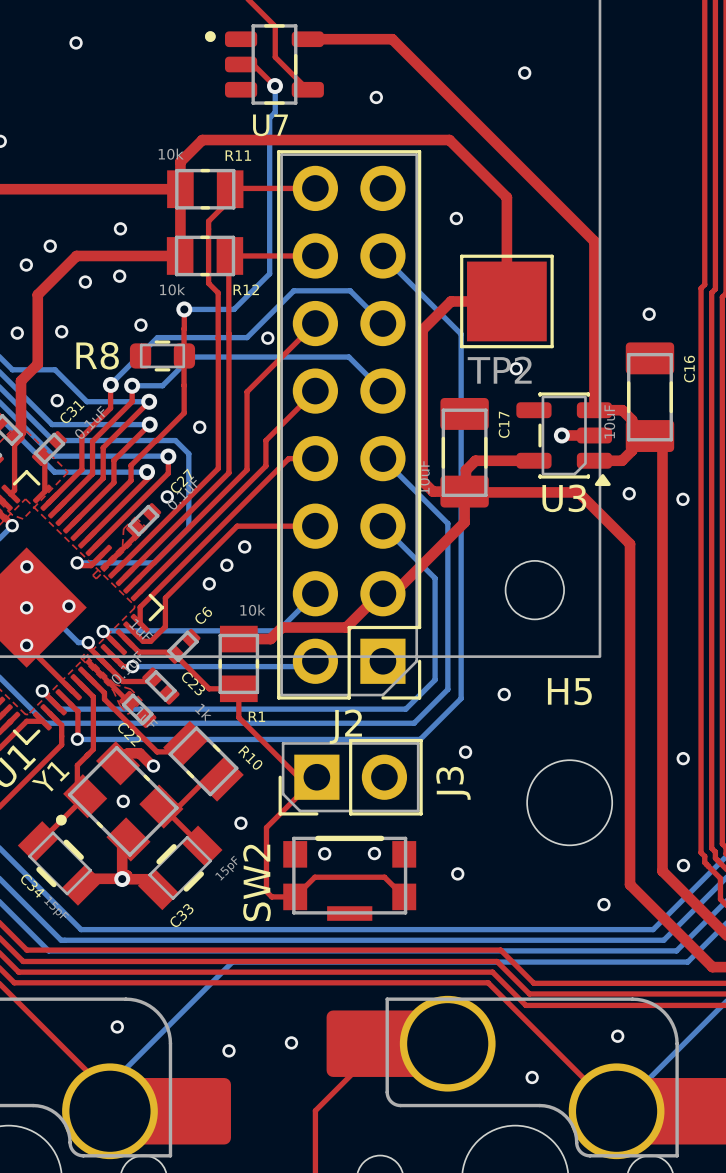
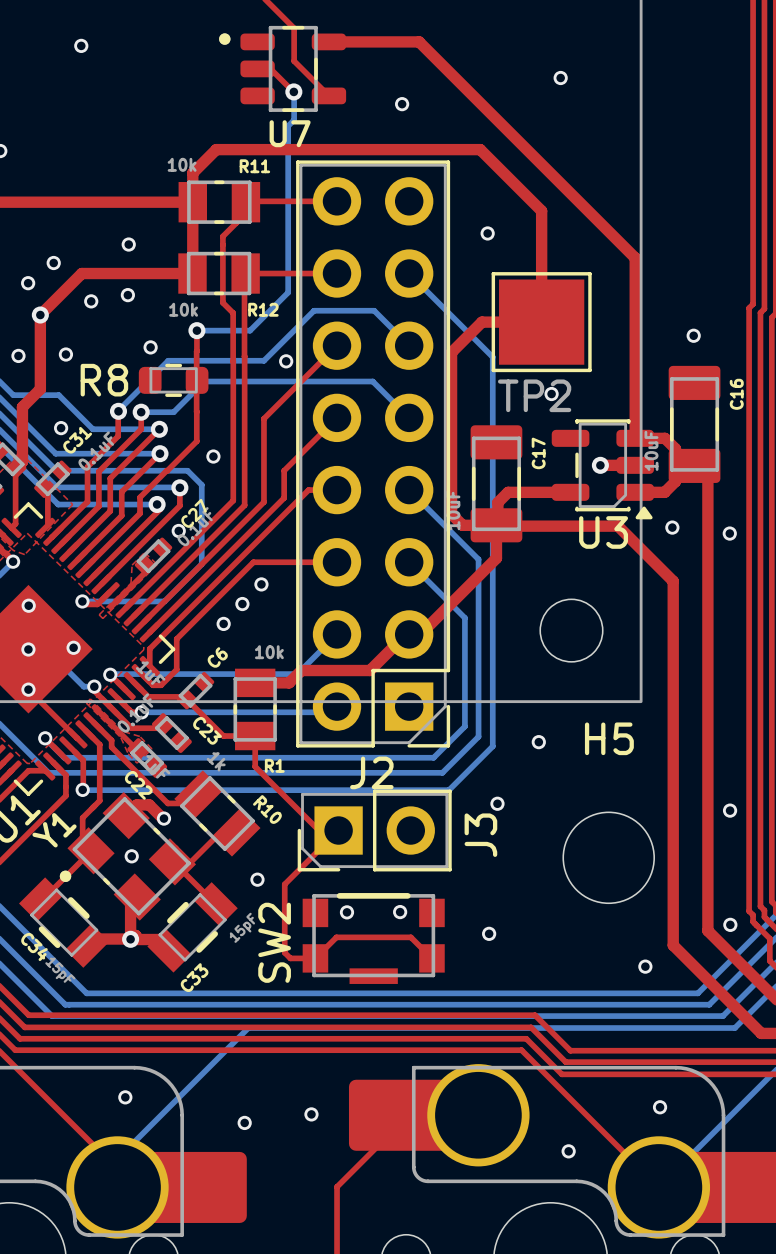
via: none -> (40, 315)

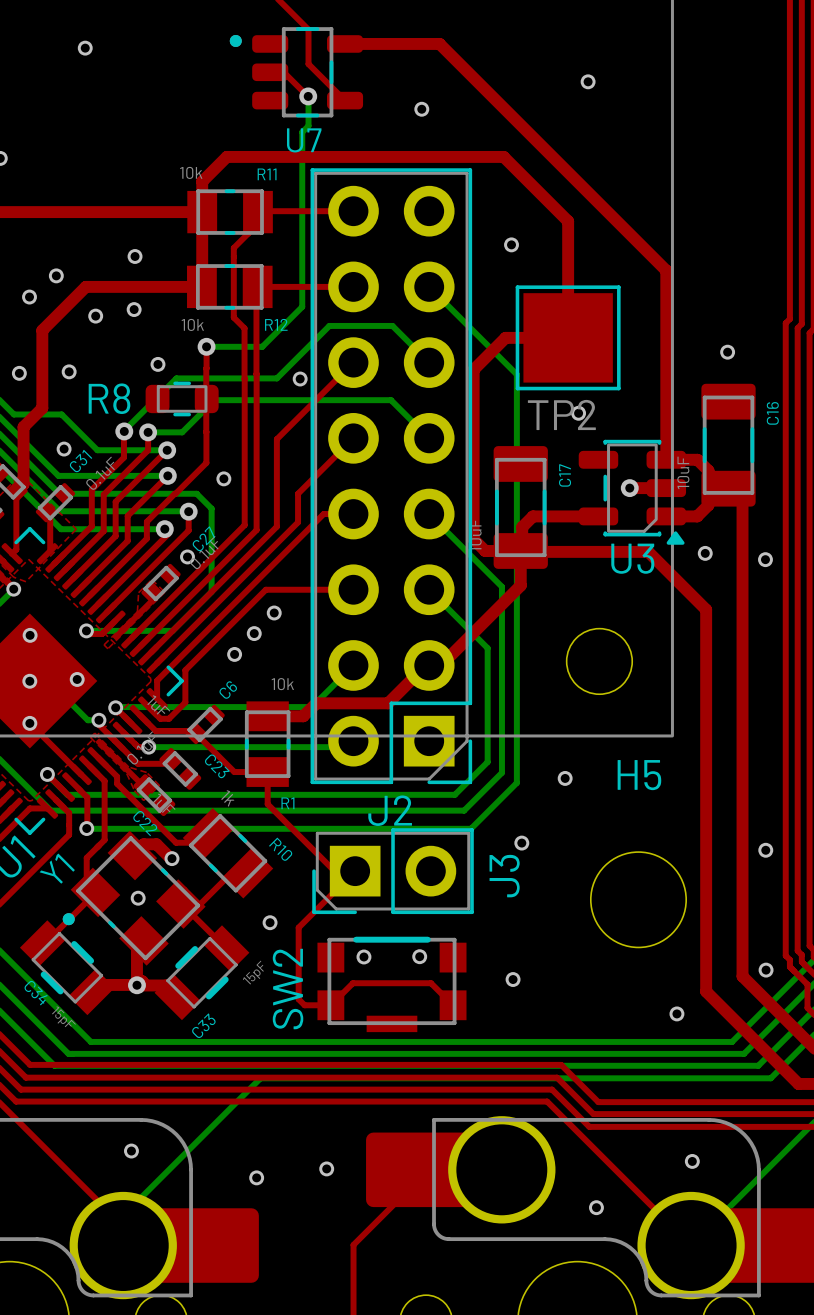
via: (40, 315) -> none

